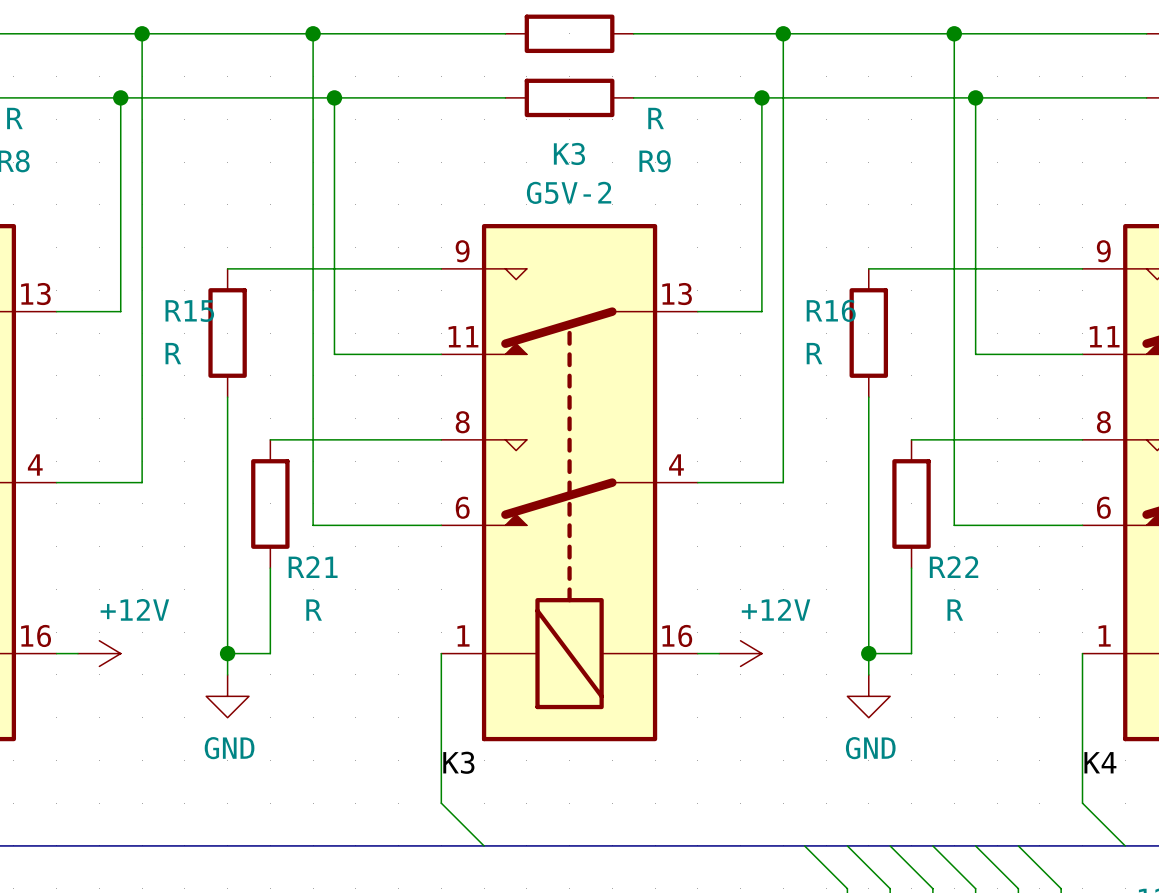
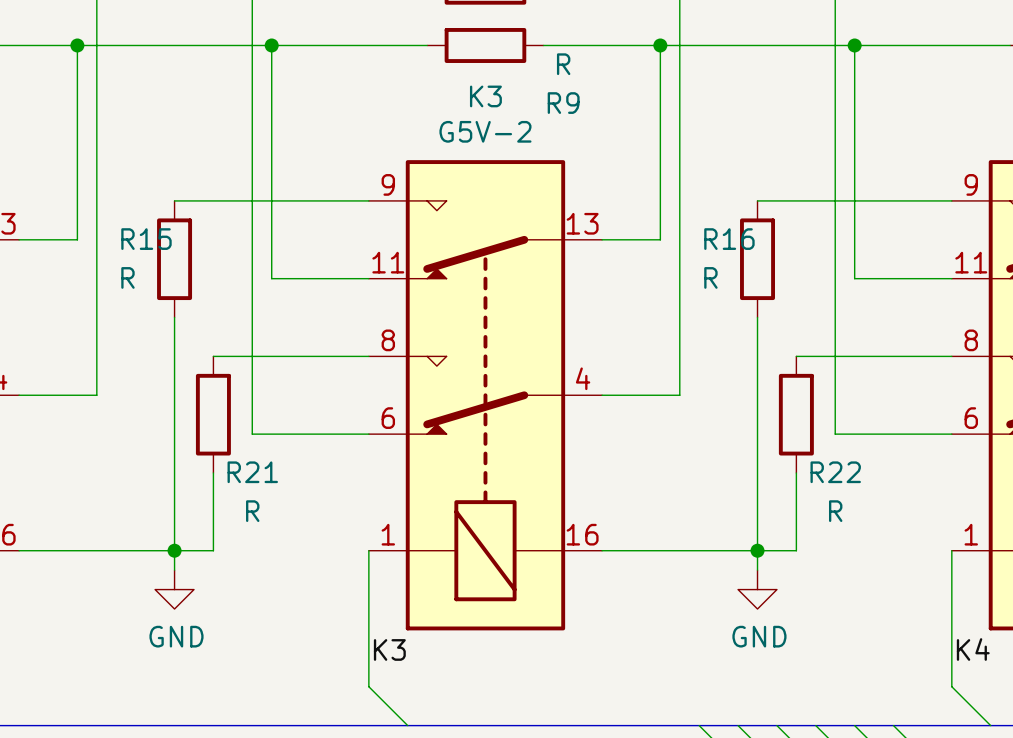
wire: none -> (38, 550) (174, 550)
power symbol: +12V (99, 653) -> none
wire: none -> (621, 550) (757, 550)
power symbol: +12V (740, 653) -> none

